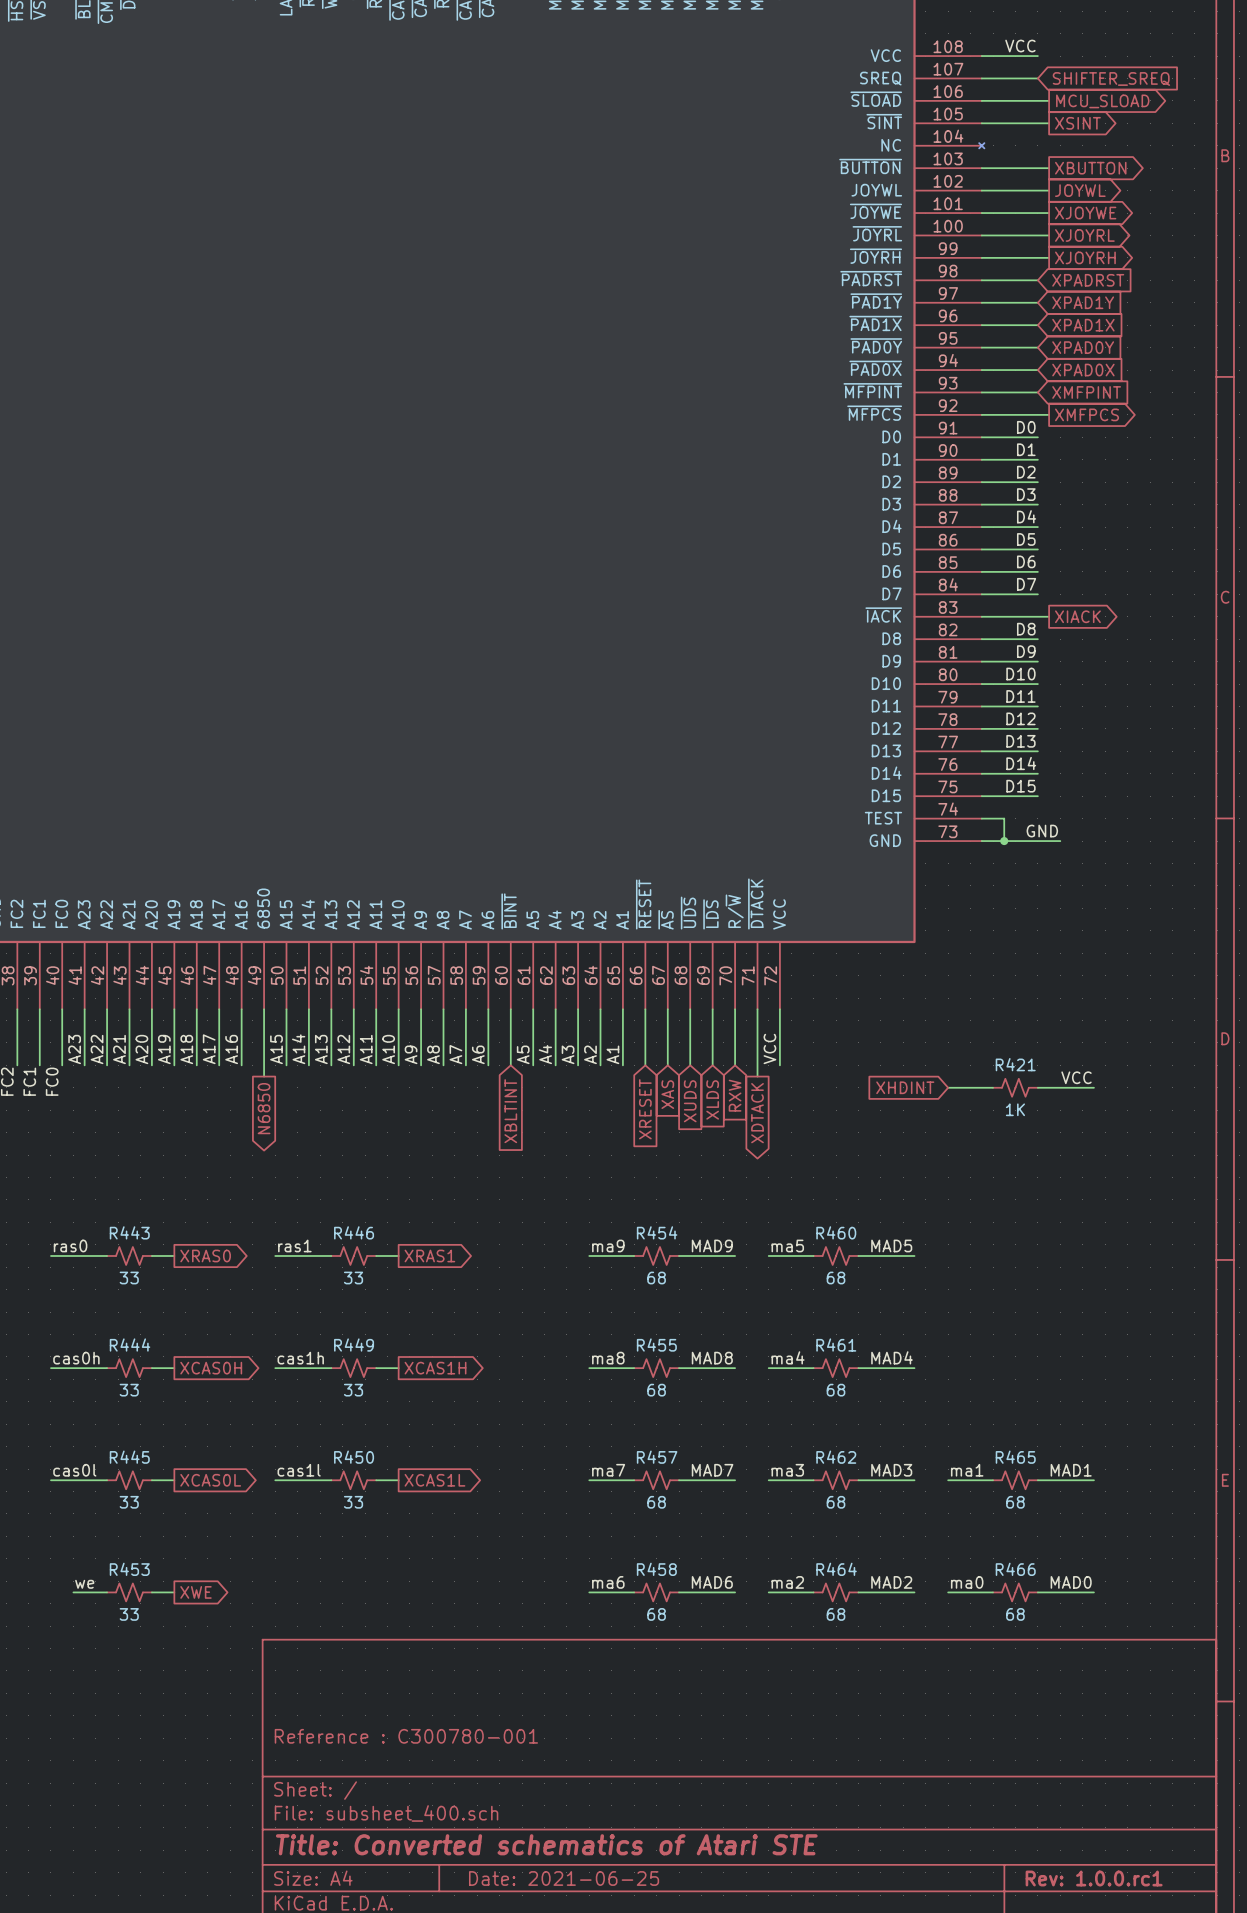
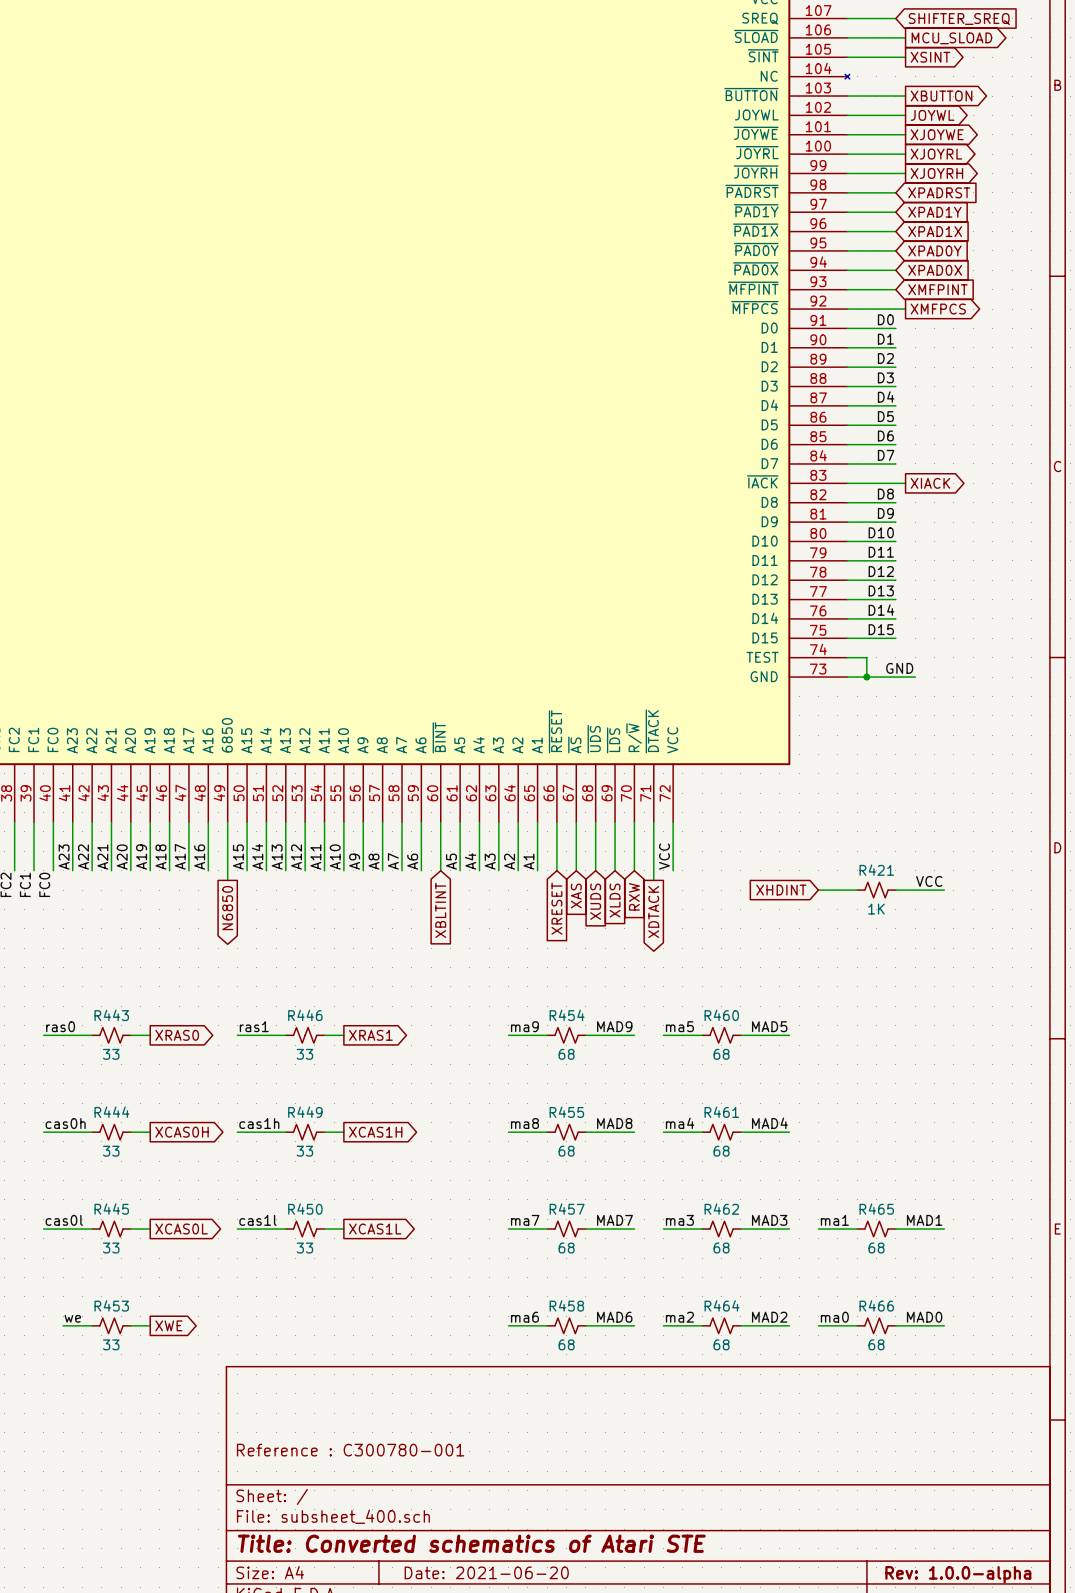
title block: Date: 2021-06-25 (564, 1878) -> Date: 2021-06-20 (486, 1572)
title block: Rev: 1.0.0.rc1 (1094, 1878) -> Rev: 1.0.0-alpha (958, 1574)

